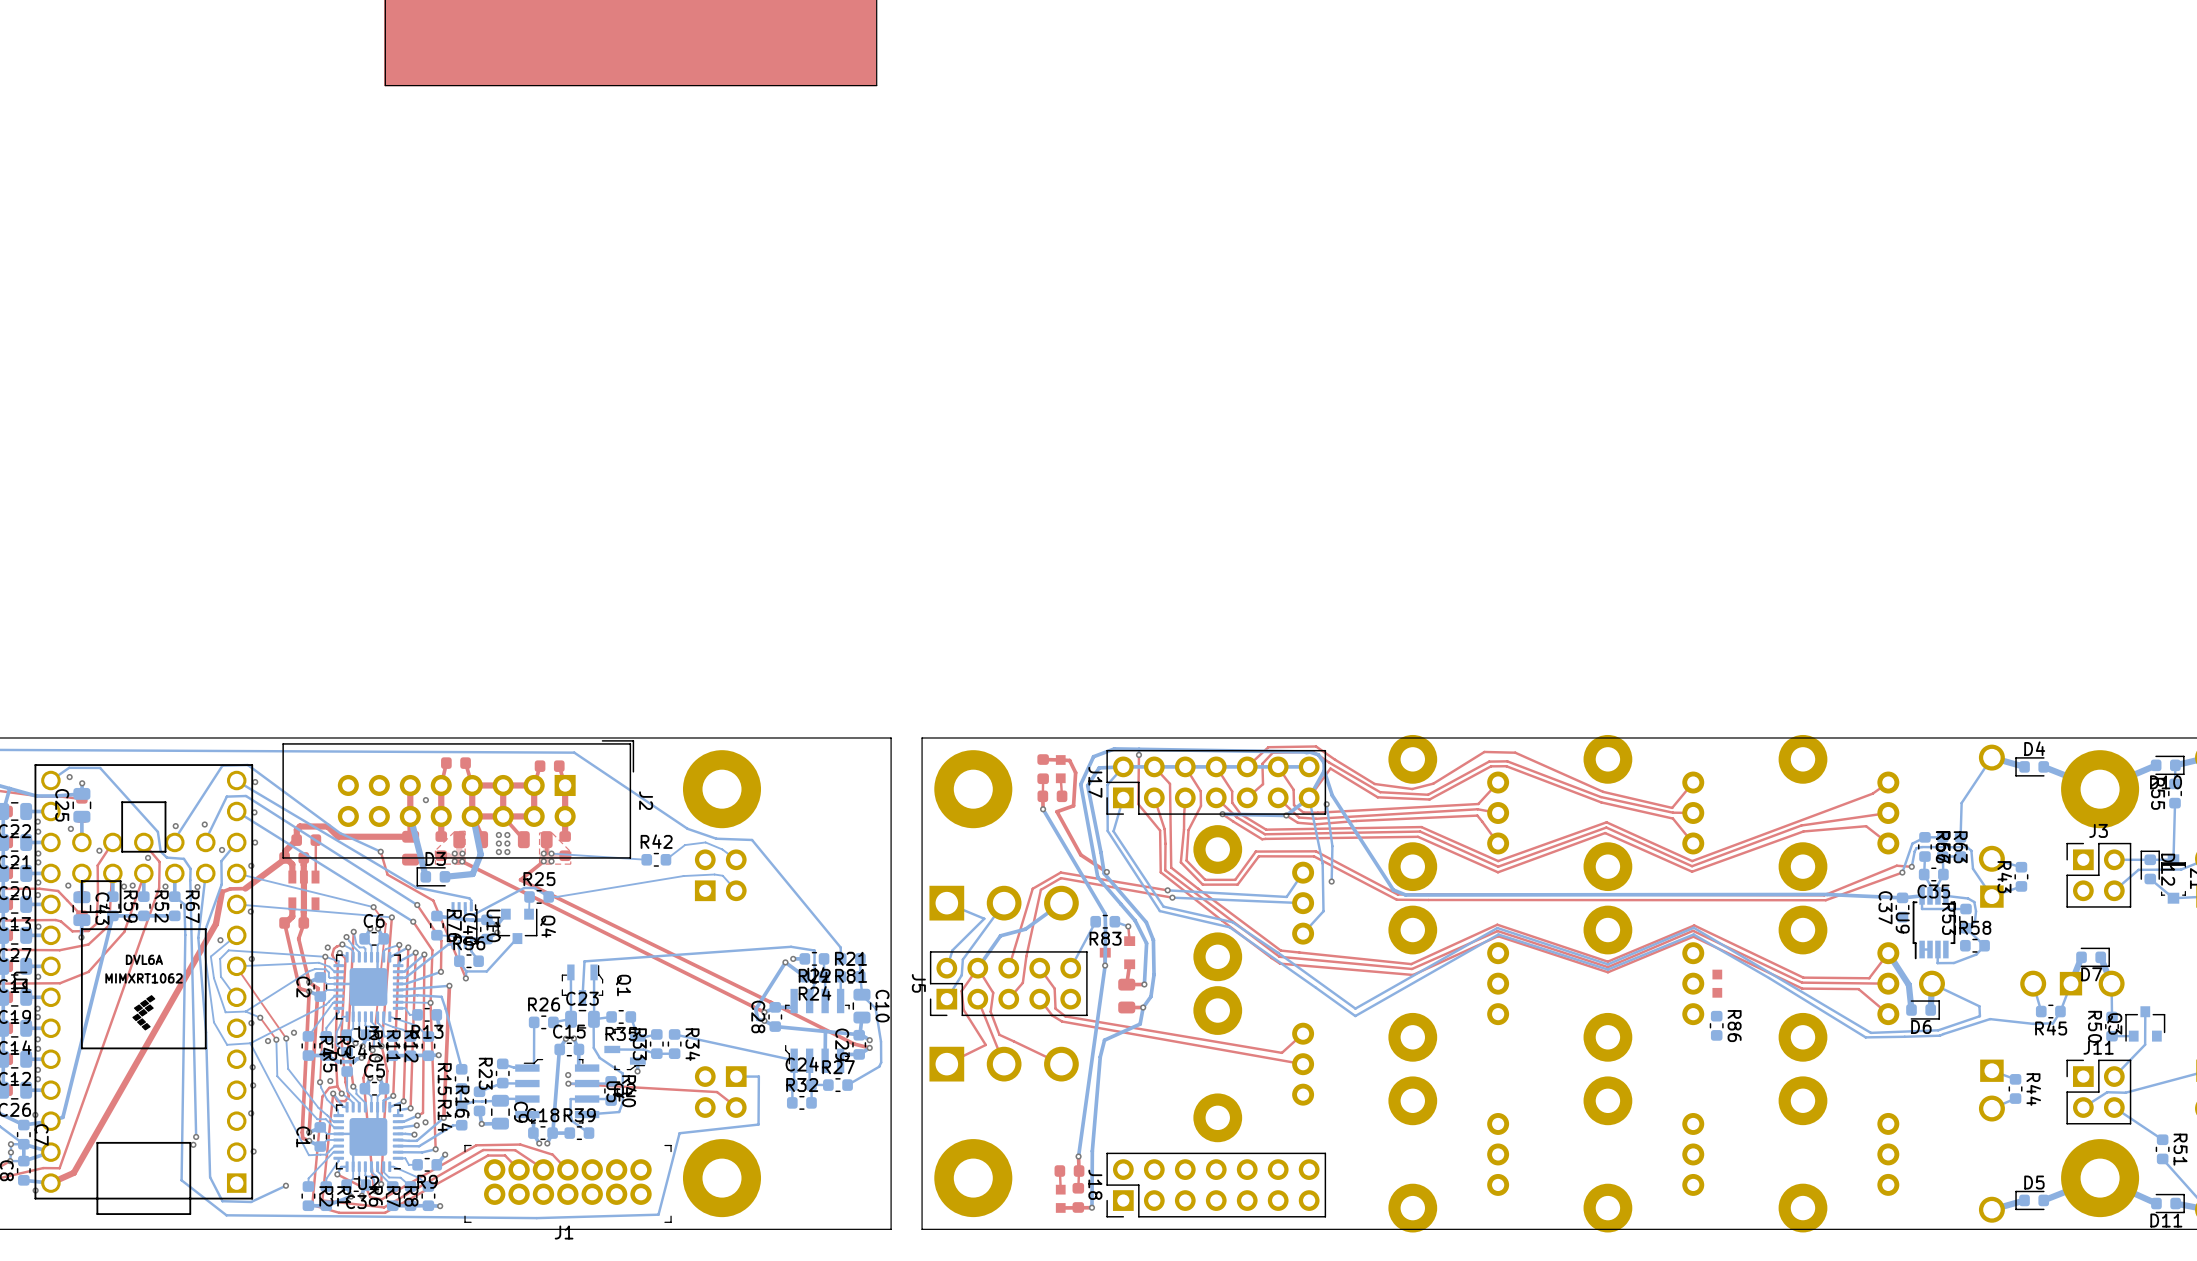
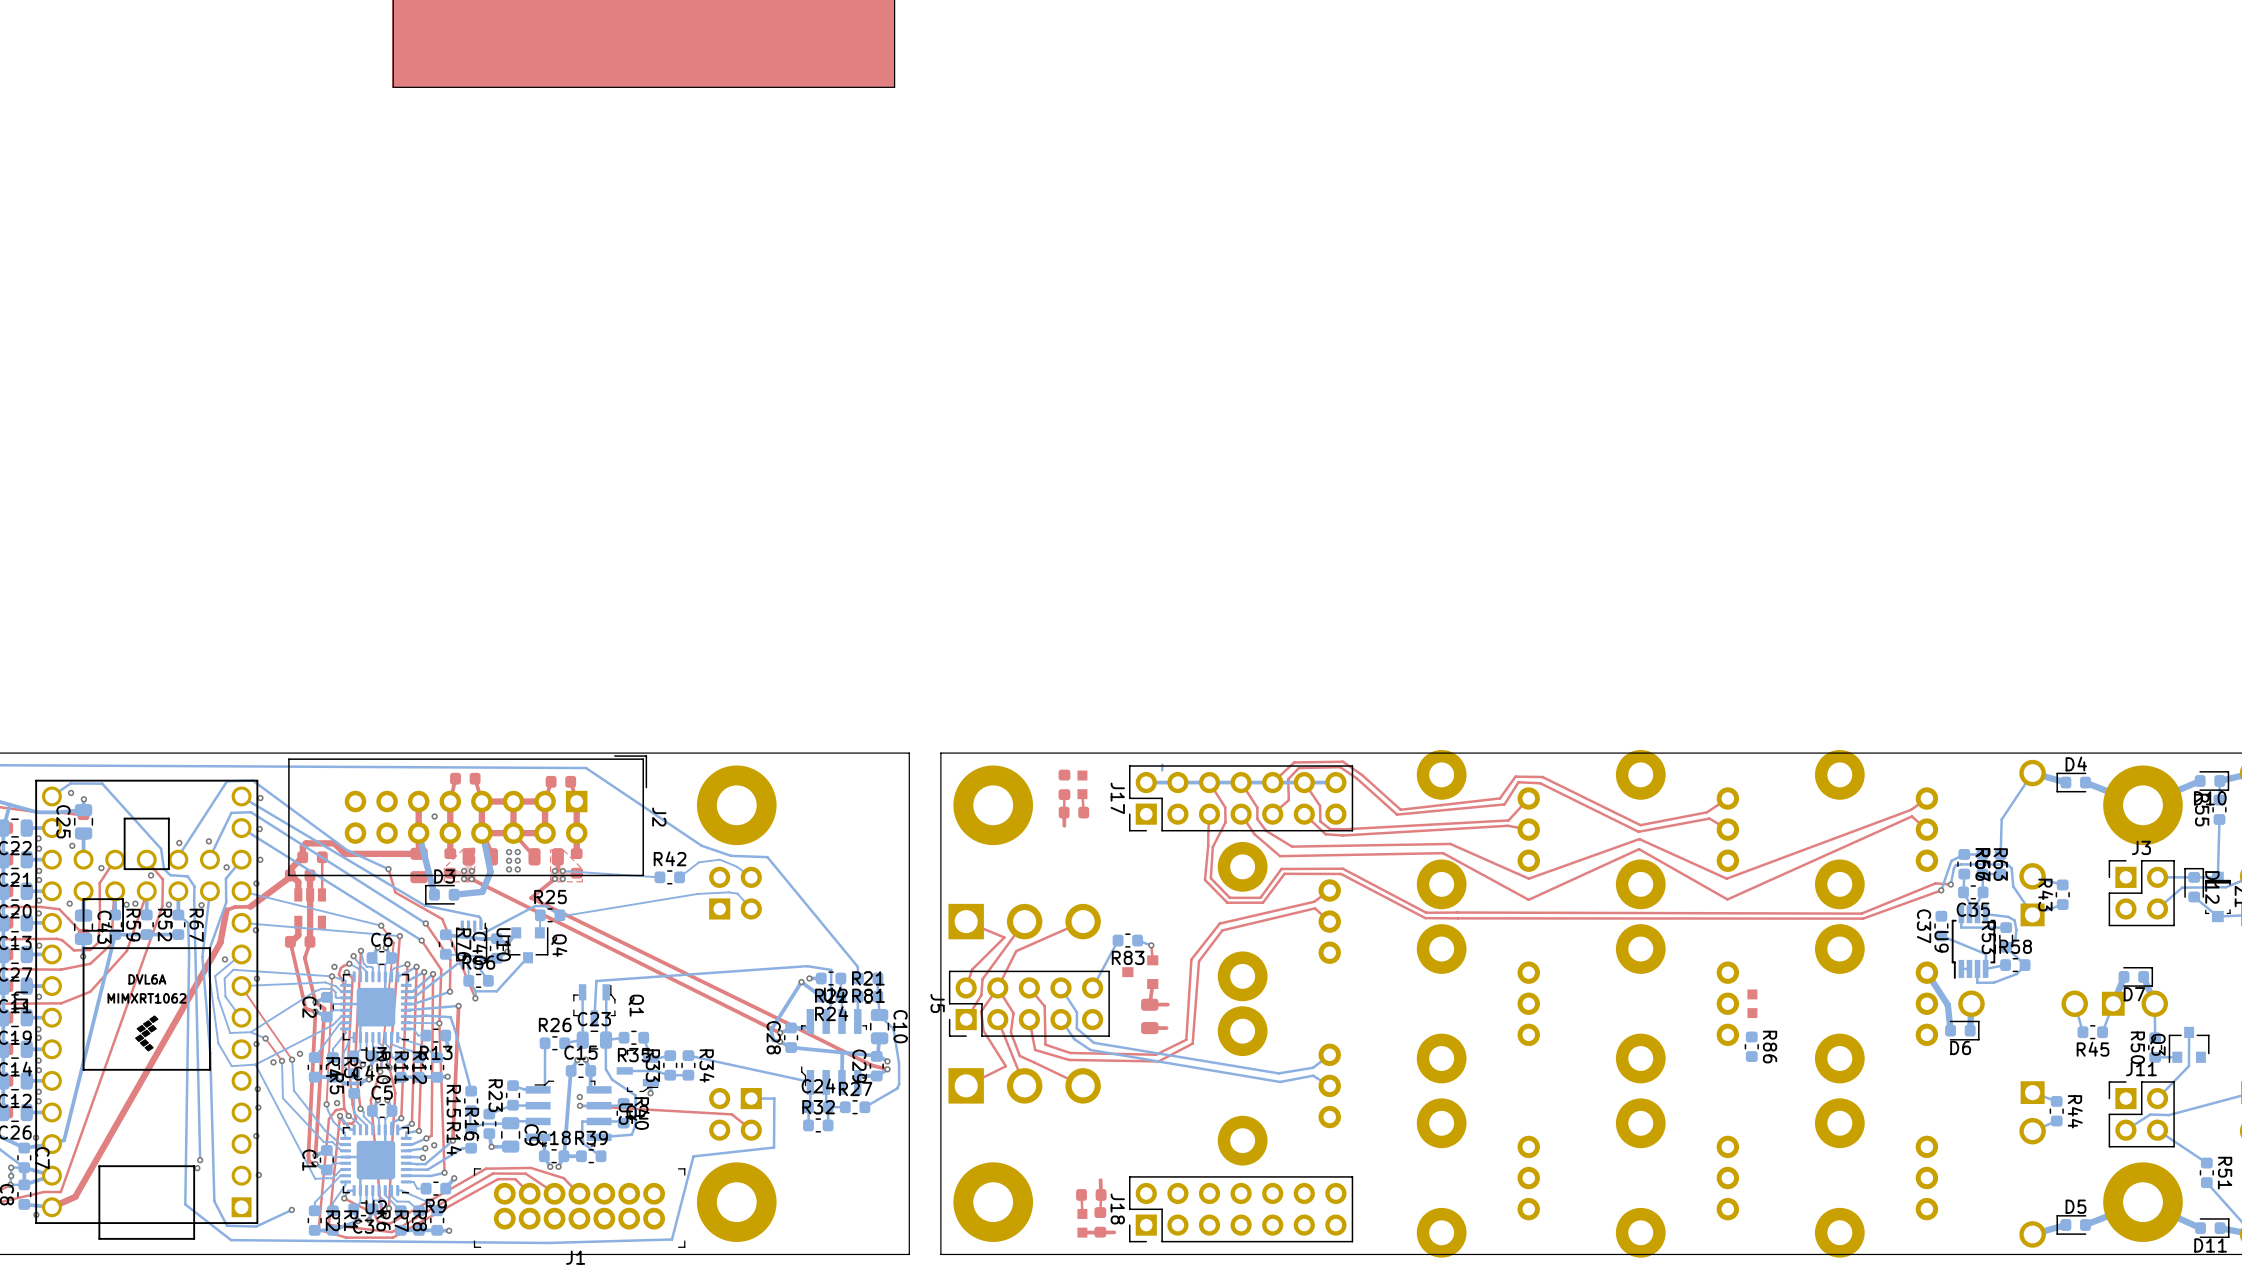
bottom track: (1309, 752) (1318, 754) (1324, 762) (1324, 770) -> none
bottom track: (1309, 752) (1114, 748) (1093, 756) (1080, 784) (1097, 877) (1135, 920) (1146, 943) (1144, 984) -> none
top track: (1138, 754) (1138, 804) (1160, 830) (1160, 872) (1279, 963) (1413, 974) (1498, 936) (1607, 972) (1693, 936) (1802, 988) (1858, 989) (1888, 1014) -> none
via: (1138, 754) -> none
top track: (1043, 759) (1069, 760) (1075, 772) (1073, 805) (1056, 811) (1080, 854) (1106, 872) -> none
top track: (1334, 759) (1374, 784) (1412, 789) (1433, 783) (1484, 751) (1515, 752) (1603, 791) (1672, 807) (1693, 782) -> (1362, 775) (1400, 809) (1499, 798) (1515, 776) (1542, 777) (1640, 825) (1706, 812) (1727, 798)
top track: (1329, 762) (1380, 792) (1428, 794) (1489, 761) (1507, 761) (1601, 797) (1673, 812) (1693, 813) -> (1356, 778) (1397, 814) (1504, 804) (1518, 782) (1540, 783) (1638, 831) (1709, 818) (1727, 829)
top track: (1154, 766) (1170, 783) (1171, 867) (1280, 950) (1411, 964) (1497, 924) (1607, 961) (1694, 925) (1803, 977) (1869, 978) (1888, 953) -> none
bottom track: (1324, 770) (1332, 795) (1393, 889) (1405, 894) (1827, 894) (1902, 897) (1922, 895) -> none
bottom track: (1324, 770) (1309, 797) -> none
bottom track: (1123, 797) (1113, 831) (1163, 906) (1232, 922) (1355, 1008) (1497, 928) (1607, 964) (1693, 927) (1870, 1032) (1938, 1030) (1979, 1016) (1979, 1006) (1931, 983) -> none
top track: (1154, 797) (1164, 829) (1165, 870) (1279, 956) (1412, 968) (1497, 931) (1607, 967) (1693, 930) (1802, 982) (1888, 983) -> none
top track: (1216, 797) (1236, 817) (1264, 834) (1420, 831) (1498, 866) (1606, 827) (1692, 866) (1801, 825) (1888, 813) -> (1241, 814) (1254, 834) (1280, 856) (1443, 853) (1528, 899) (1639, 849) (1727, 899) (1911, 816) (1926, 829)
bottom track: (1309, 797) (1322, 863) (1323, 911) (1303, 933) -> none
bottom track: (1309, 797) (1286, 815) (1222, 814) -> none
top track: (1309, 797) (1330, 768) (1377, 797) (1429, 799) (1491, 766) (1506, 766) (1601, 802) (1672, 818) (1693, 843) -> none
bottom track: (1326, 804) (1332, 846) (1331, 881) -> none
via: (1326, 804) -> none
bottom track: (1043, 809) (1105, 914) (1105, 965) (1078, 1156) -> none
via: (1043, 809) -> none
top track: (1222, 814) (1262, 839) (1417, 836) (1497, 872) (1605, 833) (1692, 871) (1803, 831) (1866, 826) (1888, 843) -> none
via: (1222, 814) -> none
top track: (1286, 815) (1297, 822) (1316, 824) (1477, 815) (1498, 843) -> none
via: (1286, 815) -> none
via: (1106, 872) -> none
bottom track: (1303, 872) (1286, 896) (1167, 890) -> none
via: (1331, 881) -> none
top track: (1167, 890) (1060, 872) (1032, 888) (1008, 968) -> (1329, 890) (1314, 901) (1219, 923) (1191, 959) (1186, 1039) (1155, 1054) (1070, 1052) (1045, 1044) (1044, 1006) (1029, 987)
via: (1167, 890) -> none
bottom track: (1172, 897) (1303, 903) -> none
top track: (1172, 897) (1061, 878) (1040, 889) (1026, 956) (1022, 982) (1008, 999) -> (1329, 921) (1314, 908) (1222, 930) (1199, 961) (1192, 1043) (1158, 1061) (1069, 1059) (1035, 1050) (1029, 1019)
via: (1172, 897) -> none
bottom track: (946, 903) (984, 918) (952, 950) (946, 968) -> none
top track: none -> (966, 921) (1004, 937) (972, 969) (966, 987)
bottom track: (1004, 903) (962, 959) (961, 975) (946, 999) -> none
top track: none -> (1024, 921) (982, 979) (981, 995) (966, 1019)
bottom track: (1061, 903) (1025, 929) (1000, 935) (977, 968) -> none
top track: none -> (1083, 921) (1016, 951) (997, 987)
bottom track: none -> (1941, 935) (1986, 954) (1985, 968) (2005, 965)
via: (1105, 965) -> none
bottom track: none -> (1060, 987) (1076, 1012) (1076, 1028) (1093, 1042) (1278, 1073) (1313, 1067) (1329, 1054)
top track: (1039, 968) (1054, 988) (1055, 1008) (1065, 1016) (1281, 1052) (1303, 1033) -> none
via: (1144, 984) -> none
bottom track: none -> (1060, 1019) (1074, 1039) (1090, 1050) (1280, 1081) (1313, 1075) (1329, 1085)
top track: (1039, 999) (1052, 1015) (1062, 1021) (1303, 1064) -> none
via: (1143, 1007) -> none
bottom track: (2060, 1011) (2052, 1023) (2033, 1023) (1990, 1019) (1939, 1035) (1865, 1037) (1693, 934) (1607, 969) (1498, 934) (1355, 1016) (1229, 927) (1159, 911) (1107, 830) (1107, 784) (1123, 766) (1099, 767) (1087, 785) (1104, 873) (1146, 922) (1153, 940) (1154, 974) (1150, 996) (1143, 1007) (1140, 1024) (1104, 1040) (1100, 1057) (1092, 1151) (1091, 1207) -> none
via: (1078, 1156) -> none
via: (1091, 1207) -> none

